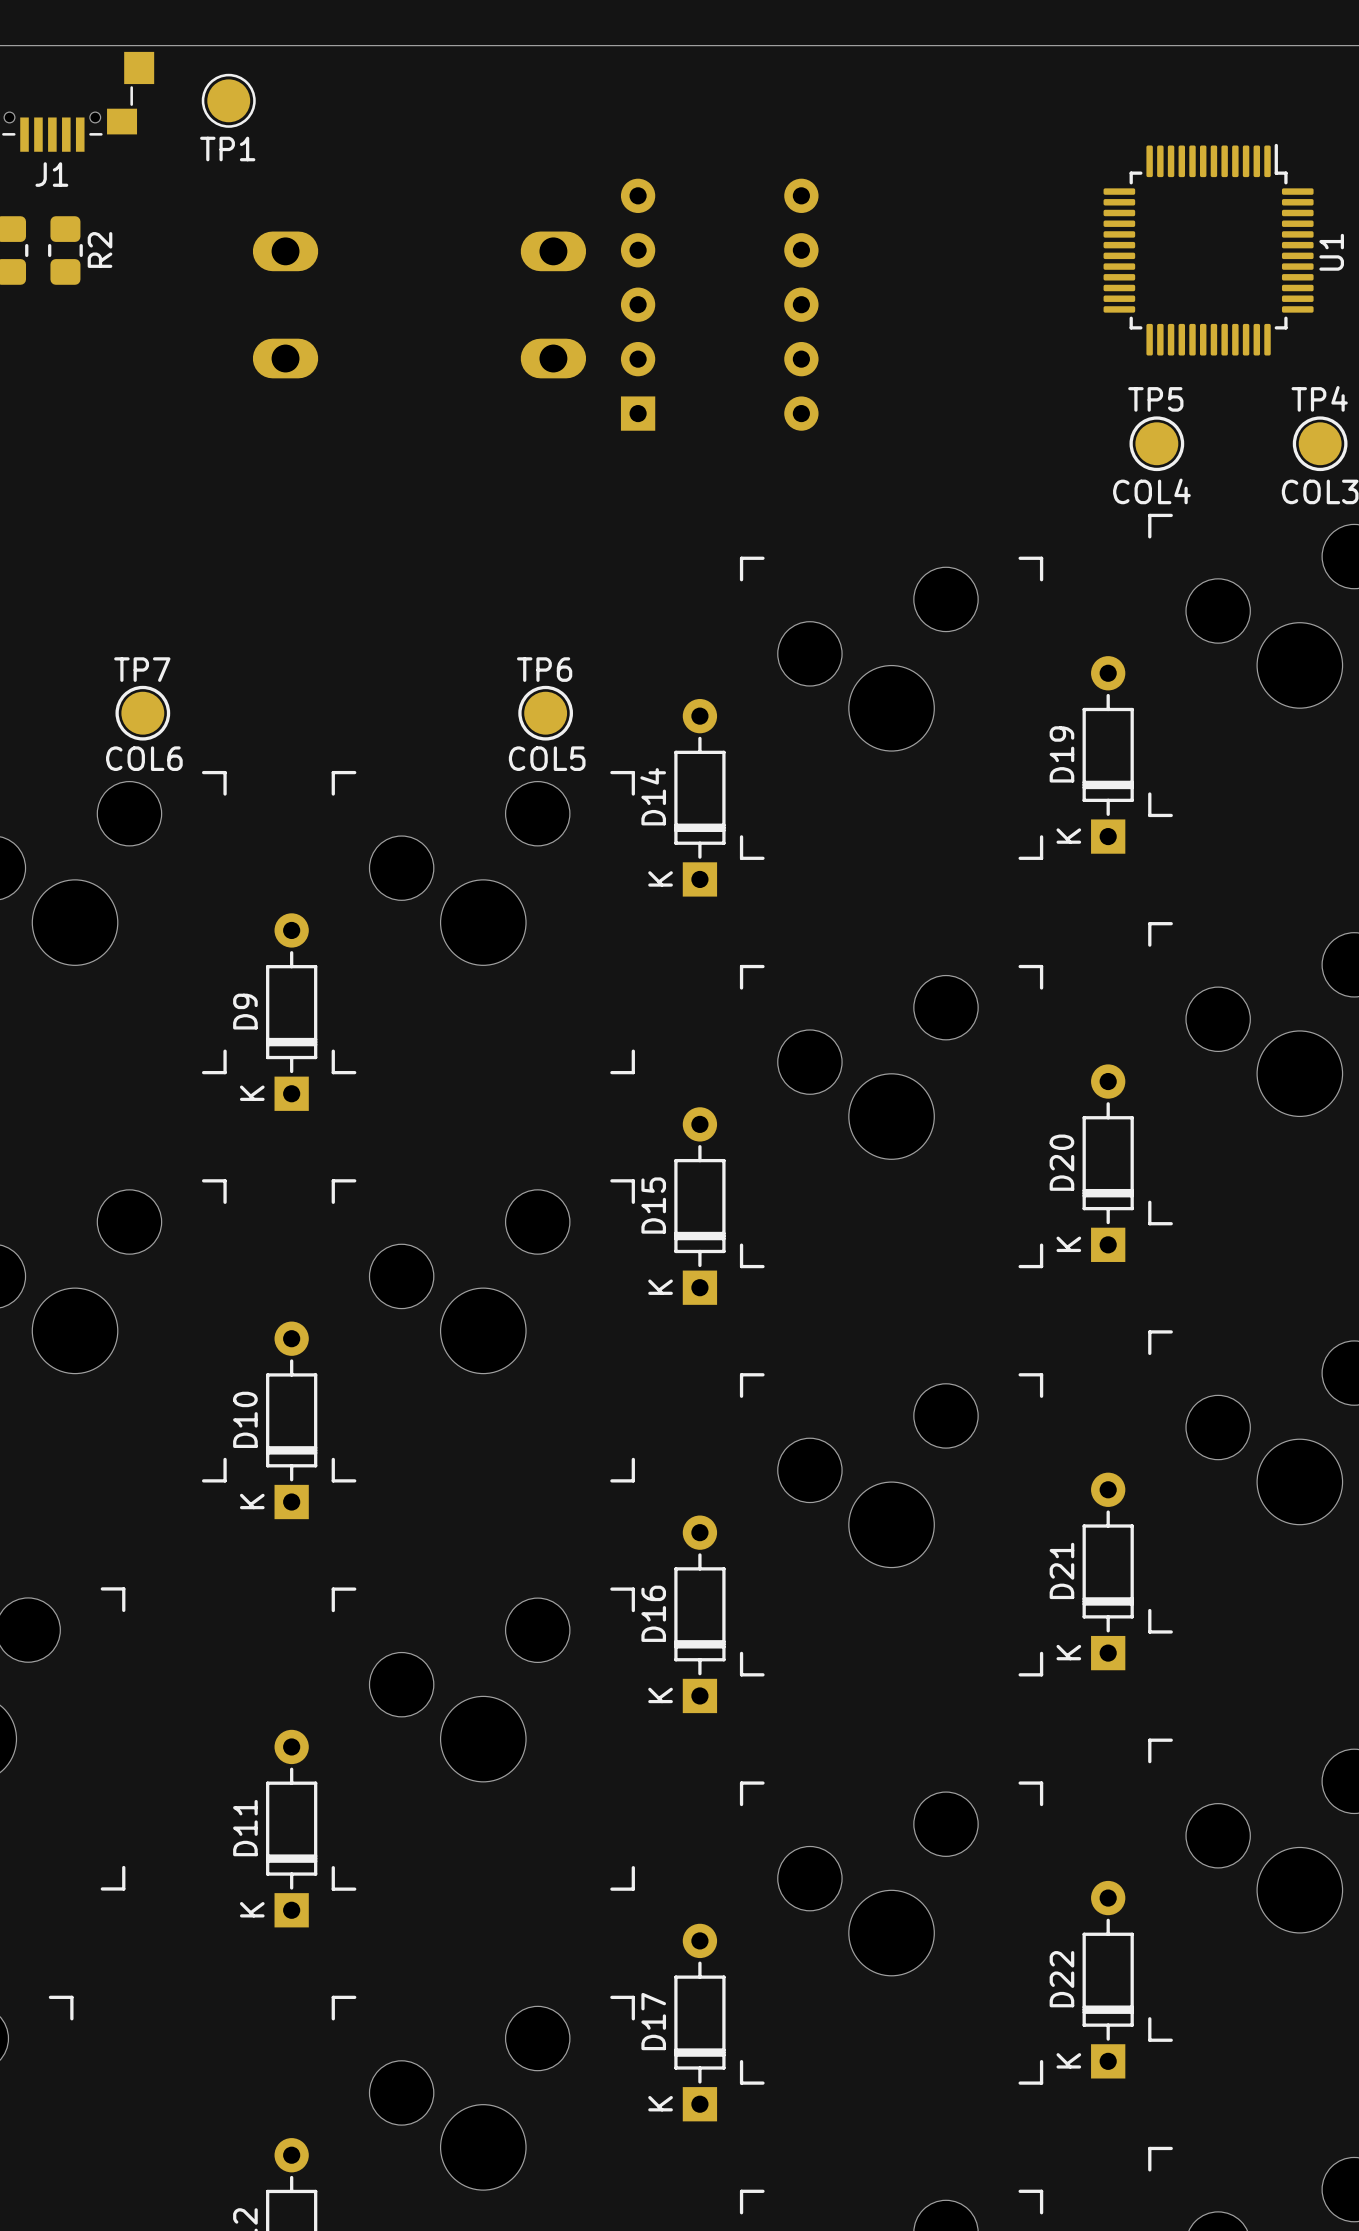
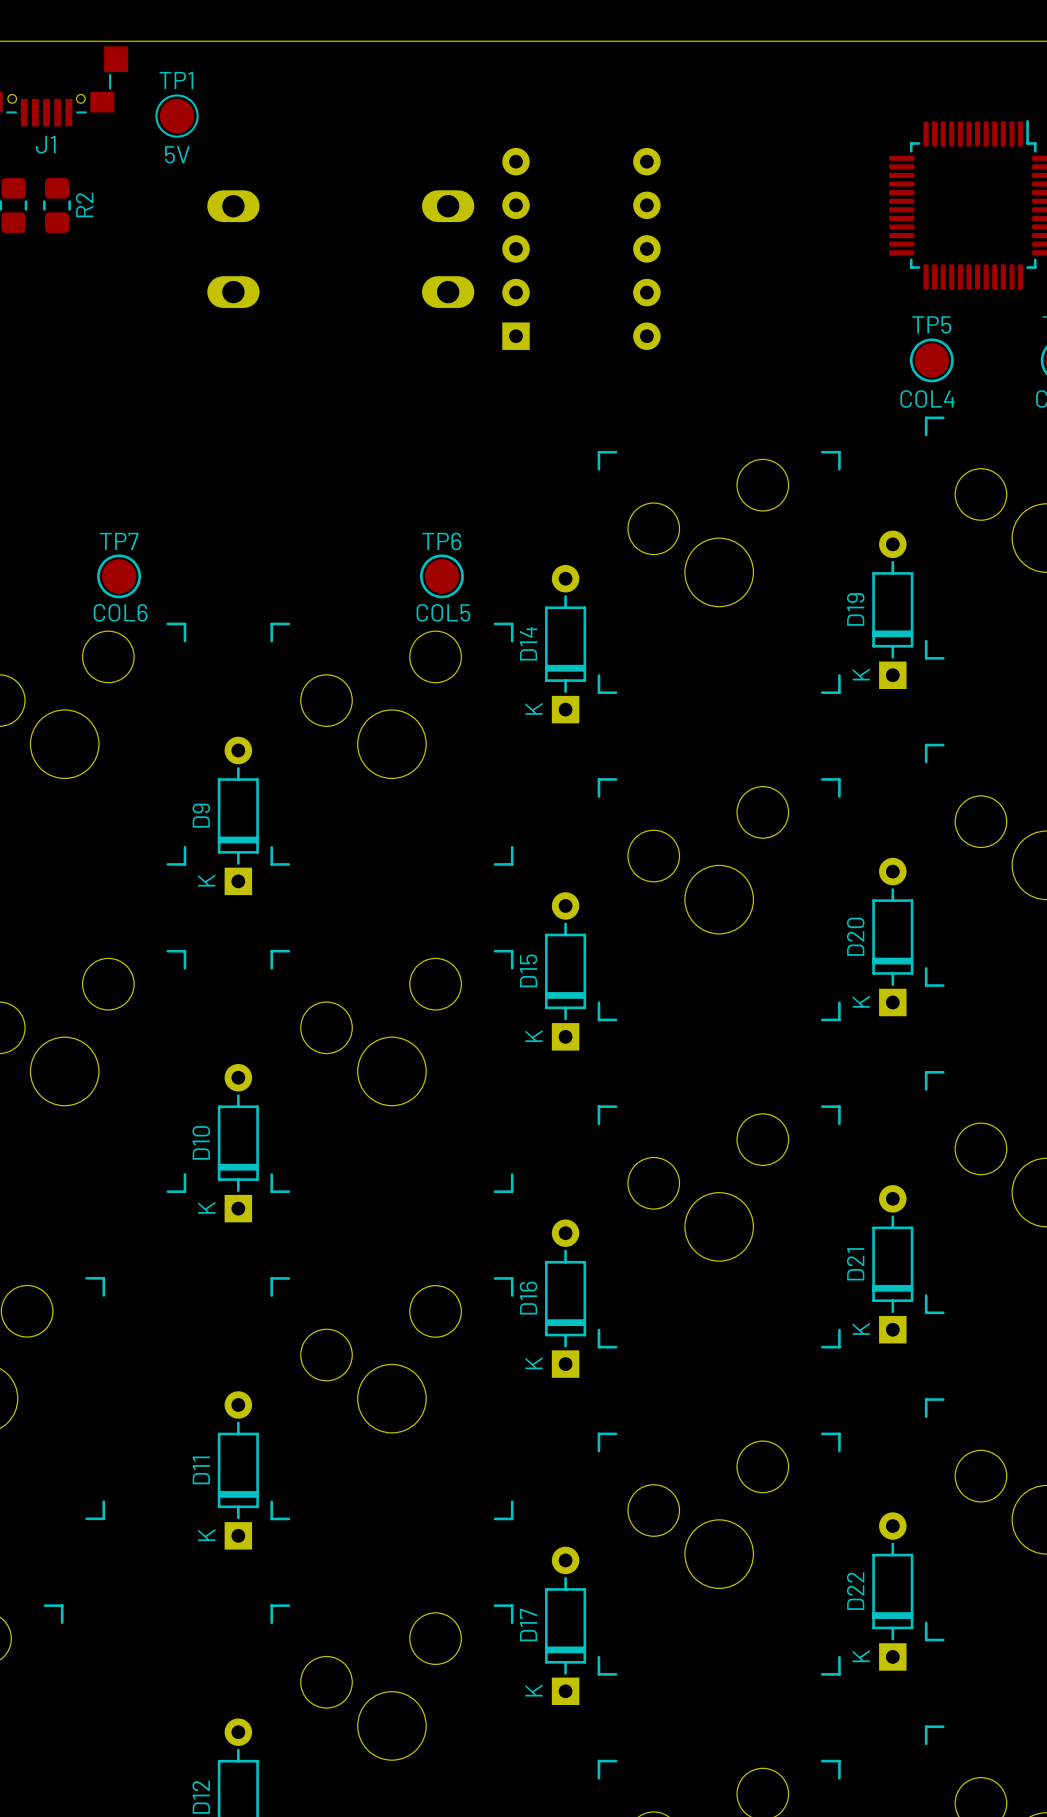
TP1 position: (228, 100) -> (177, 116)
TP1 name position: TP1 (227, 149) -> TP1 (176, 80)
text: none -> 5V (177, 154)

